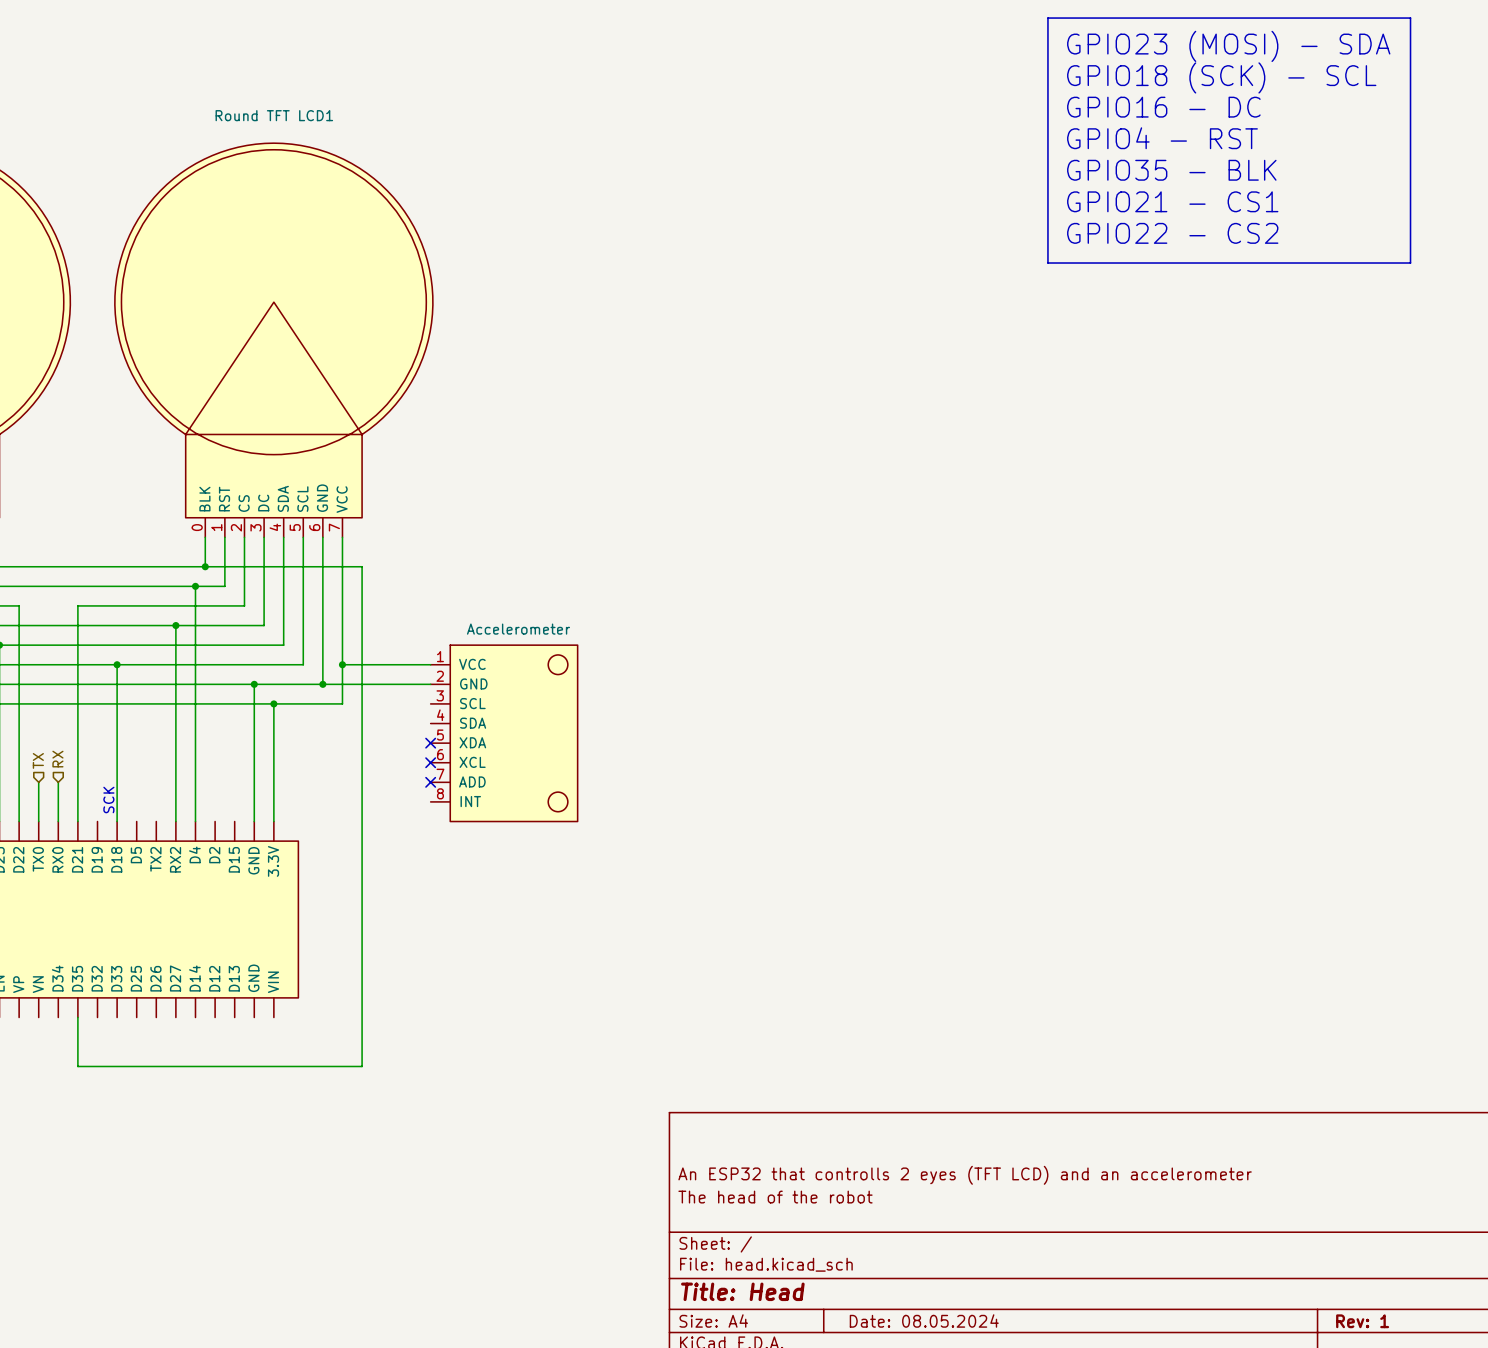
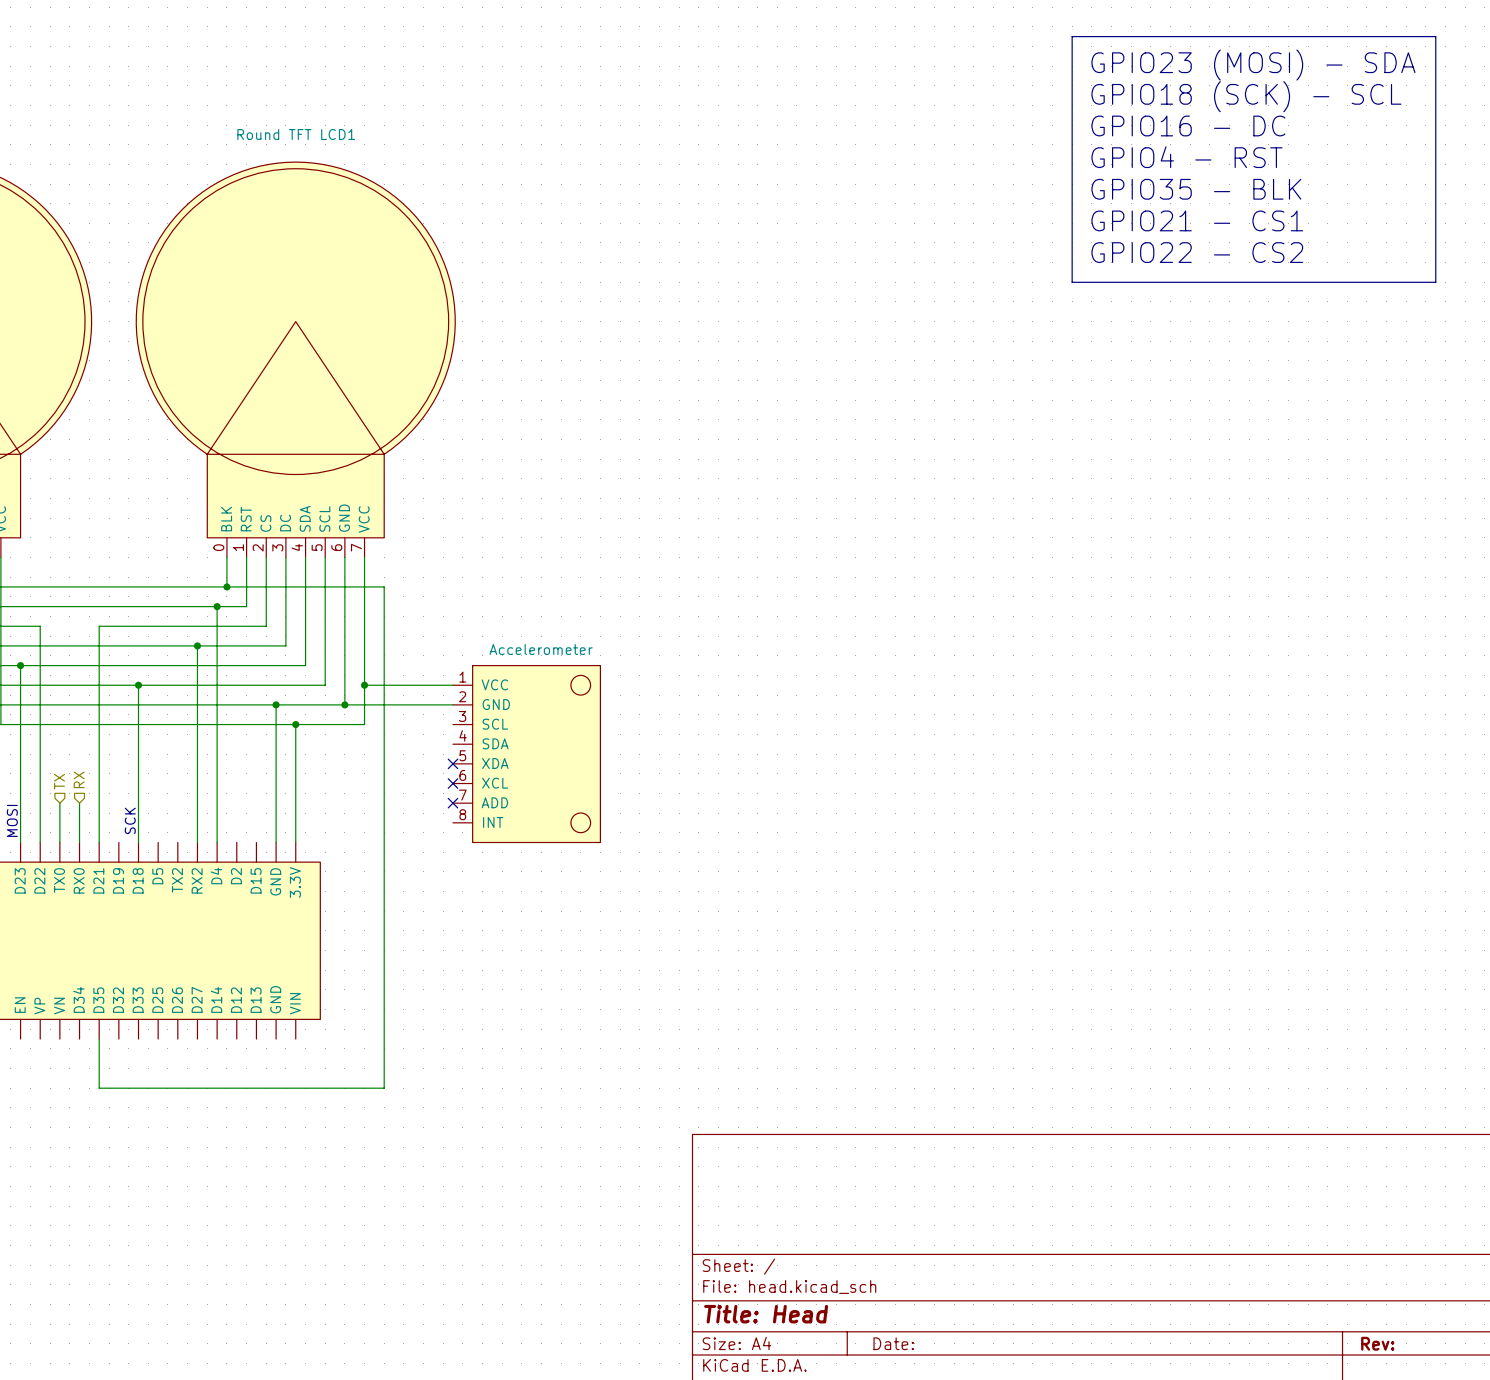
title block: An ESP32 that controlls 2 eyes (TFT LCD) and an accelerometer (965, 1175) -> none
title block: The head of the robot (775, 1197) -> none
title block: Date: 08.05.2024 (924, 1321) -> Date: (893, 1343)
title block: Rev: 1 (1362, 1321) -> Rev: (1377, 1343)

